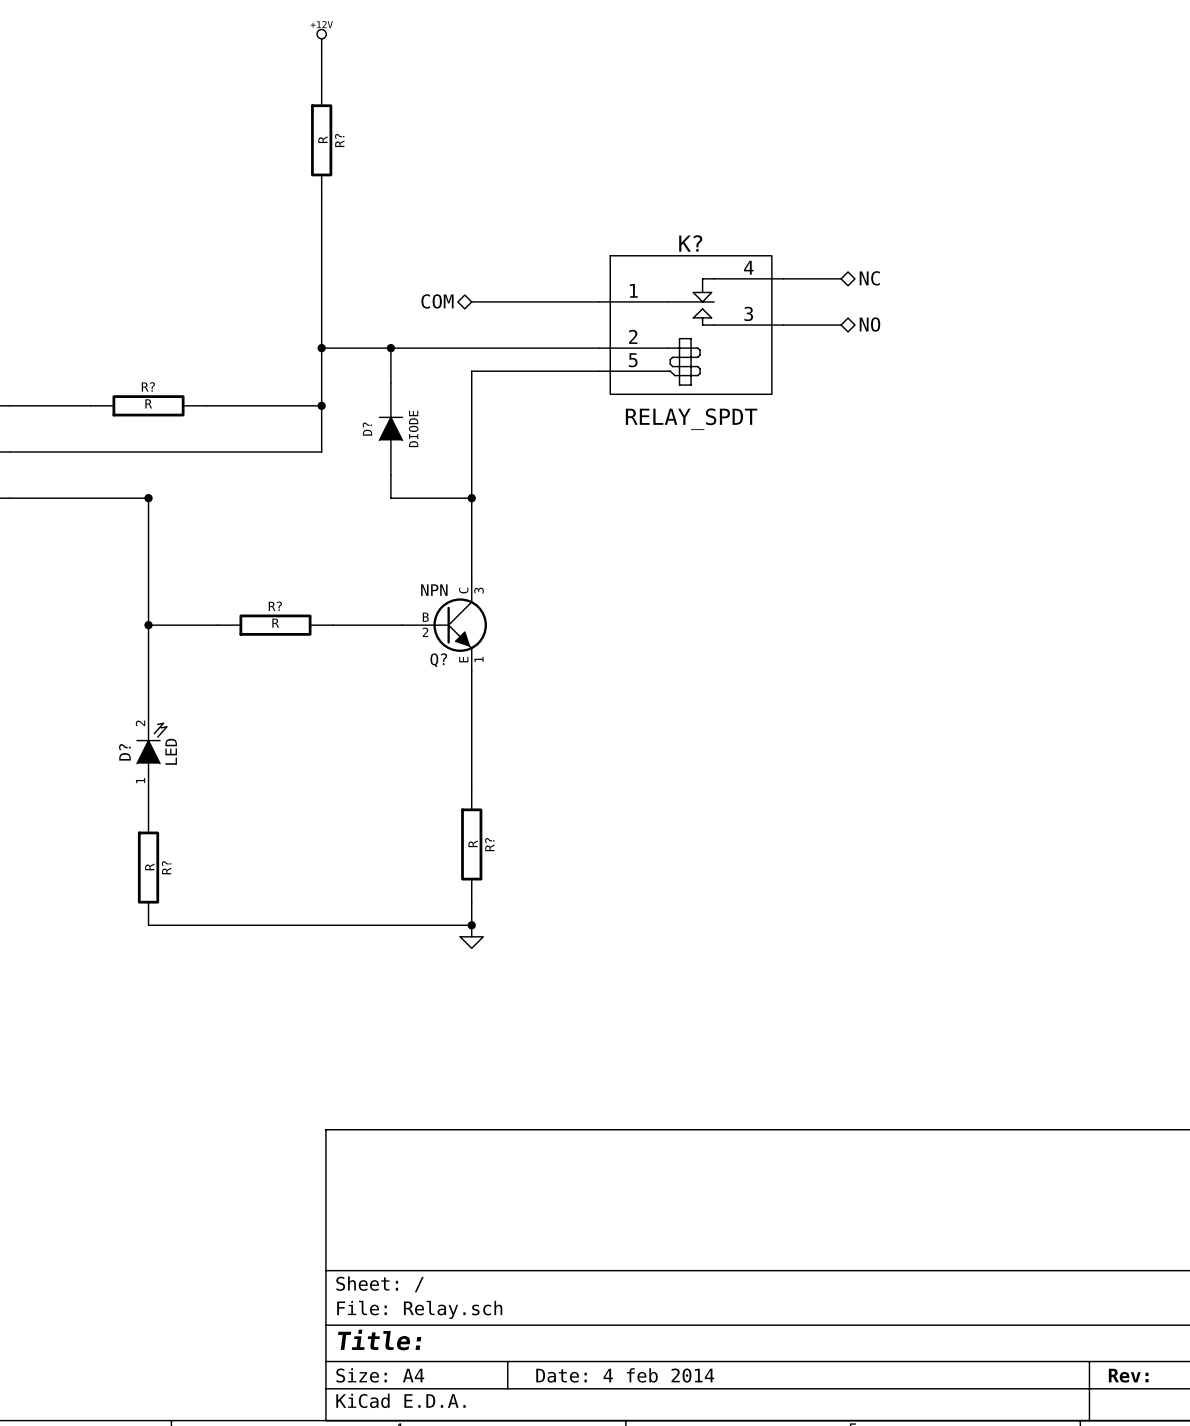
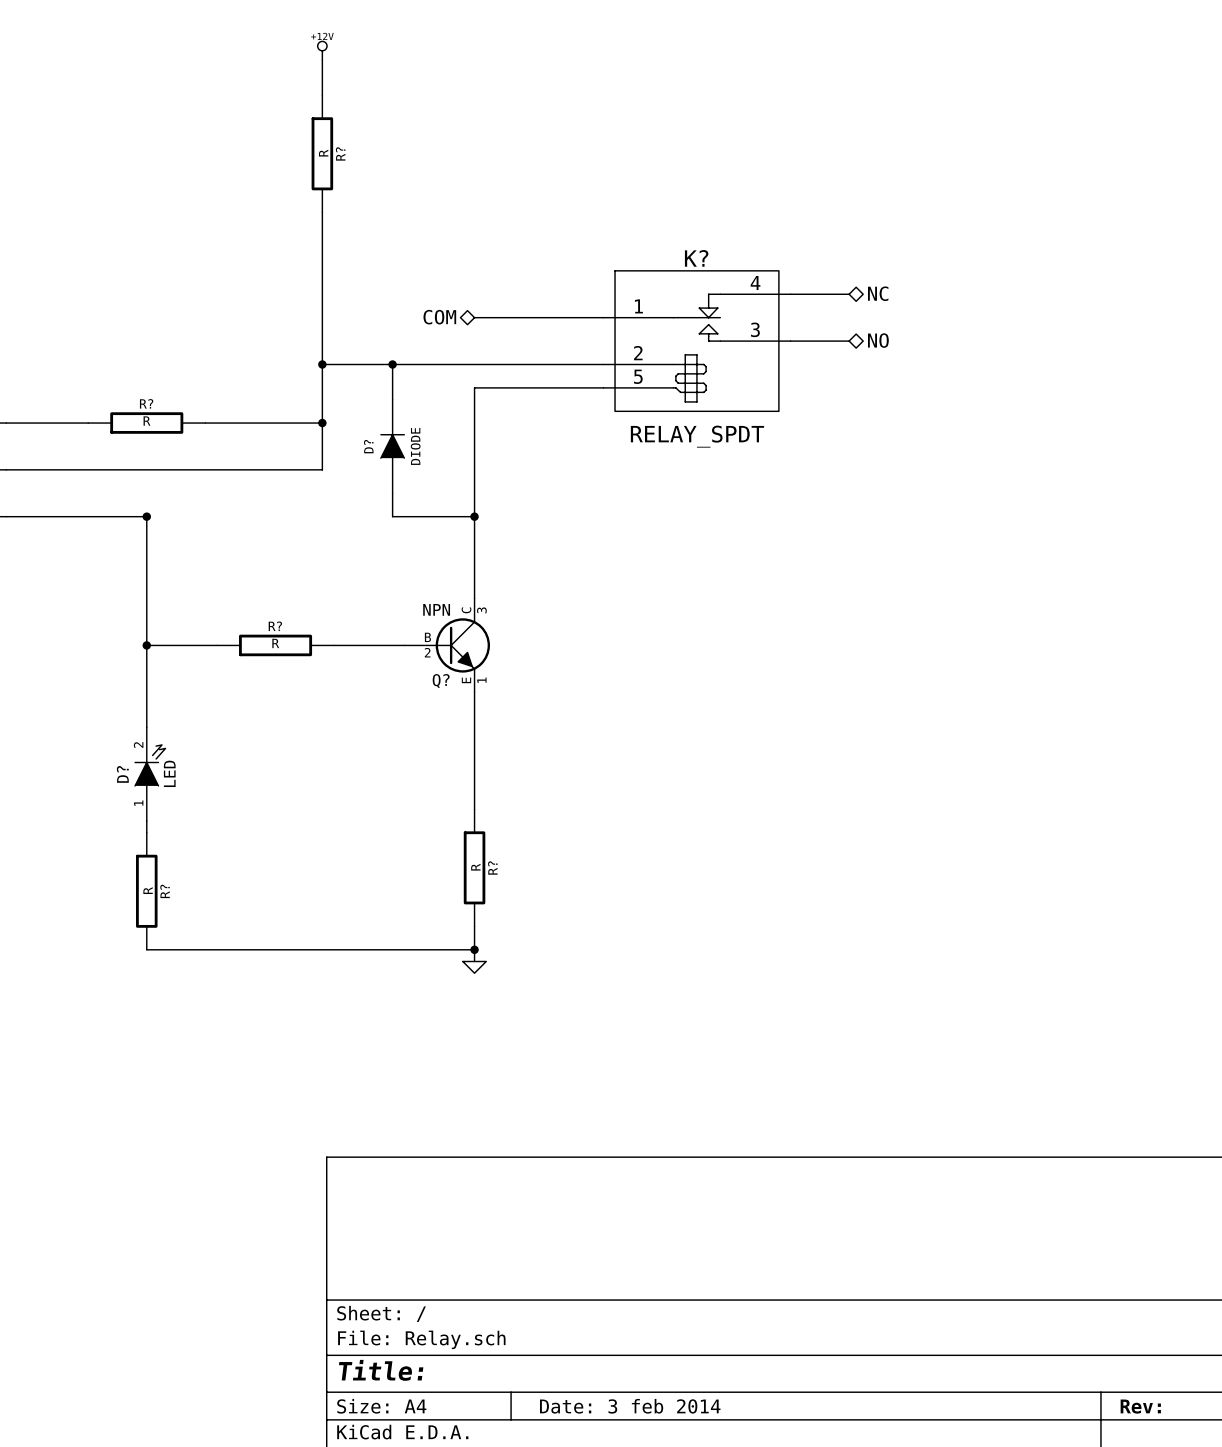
title block: Date: 4 feb 2014 (625, 1375) -> Date: 3 feb 2014 (630, 1406)

